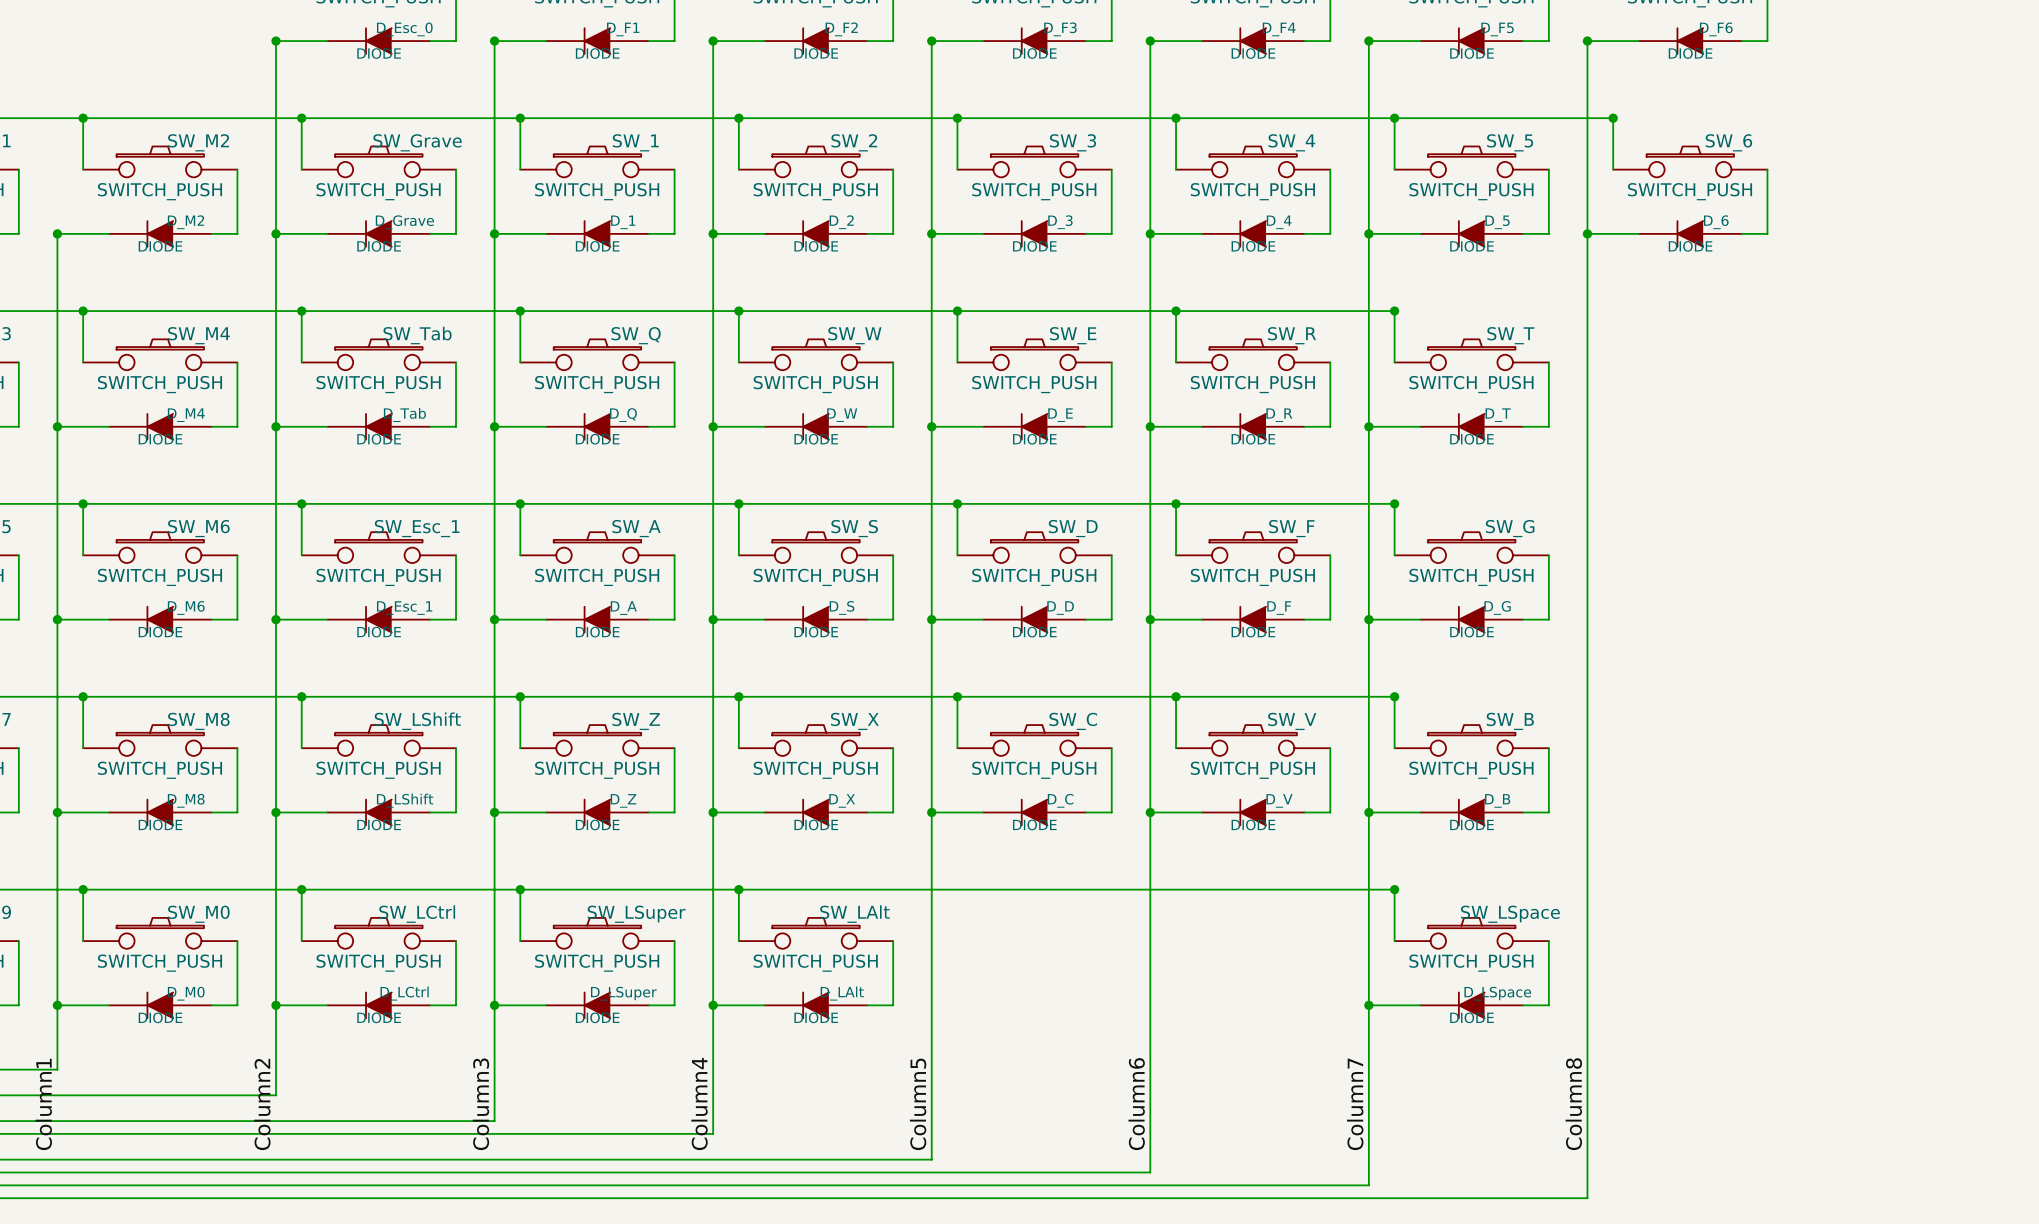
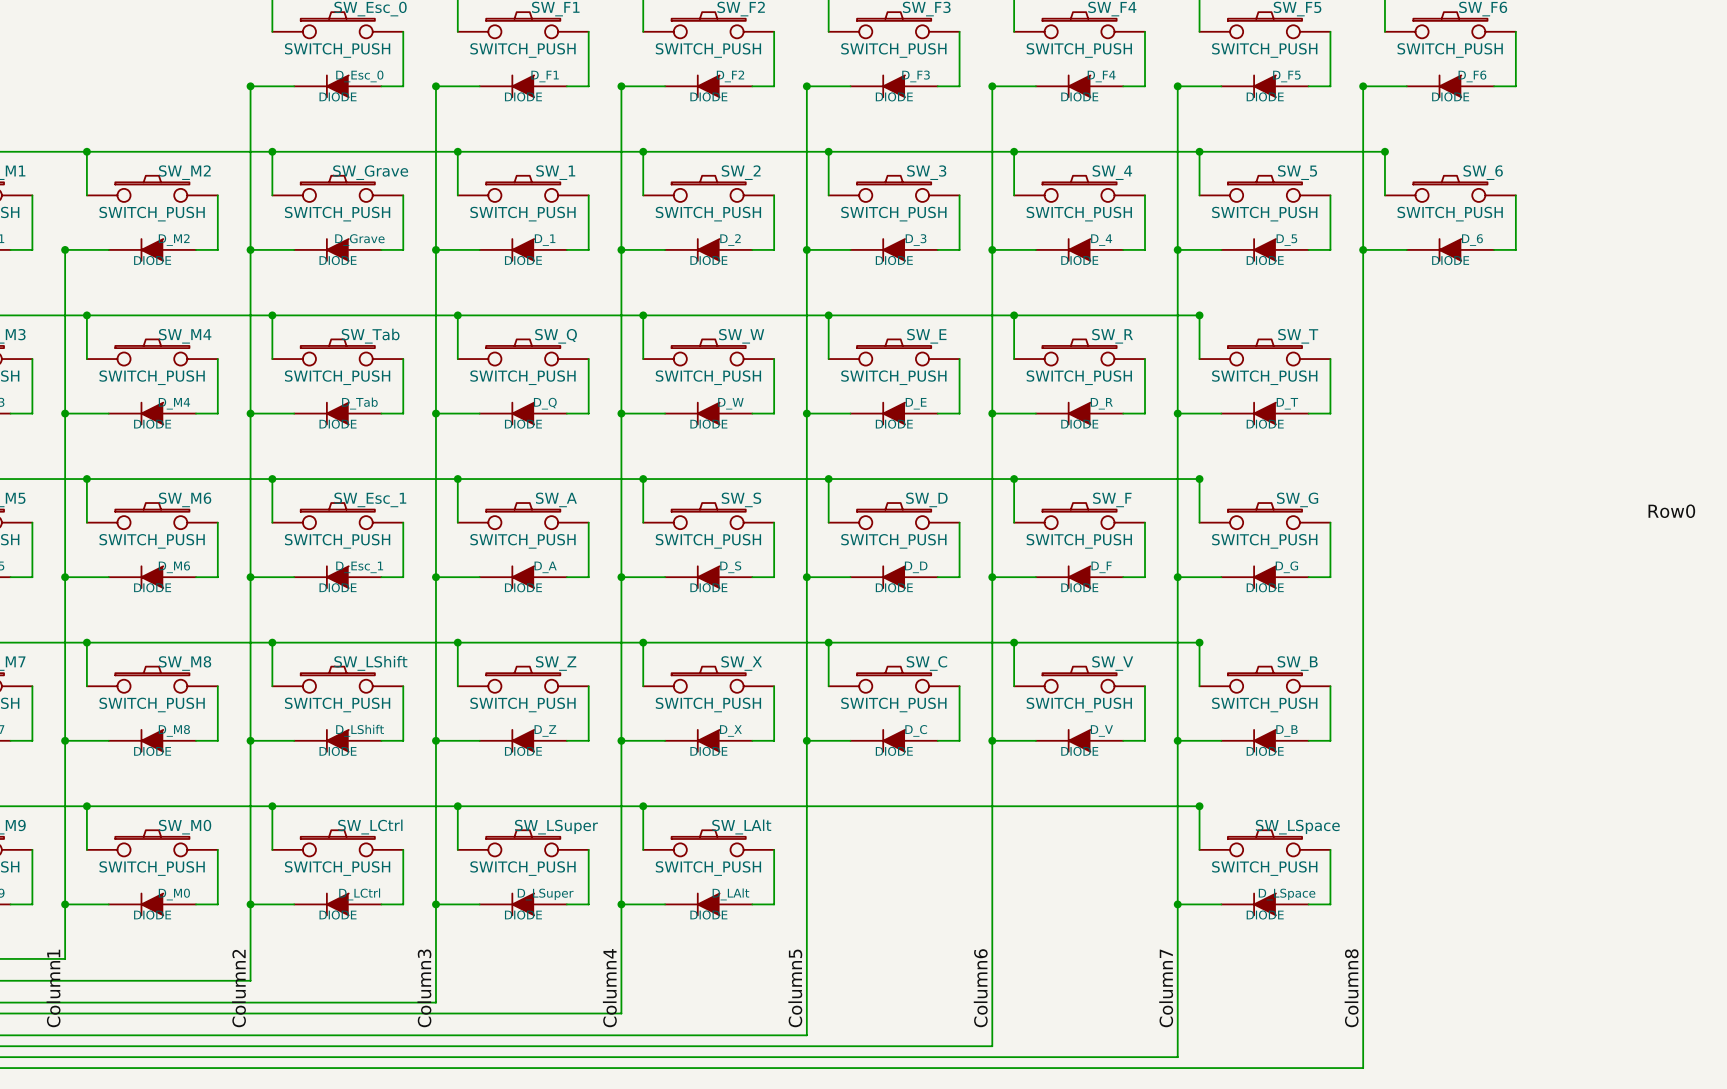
label: none -> Row0 (1671, 511)

